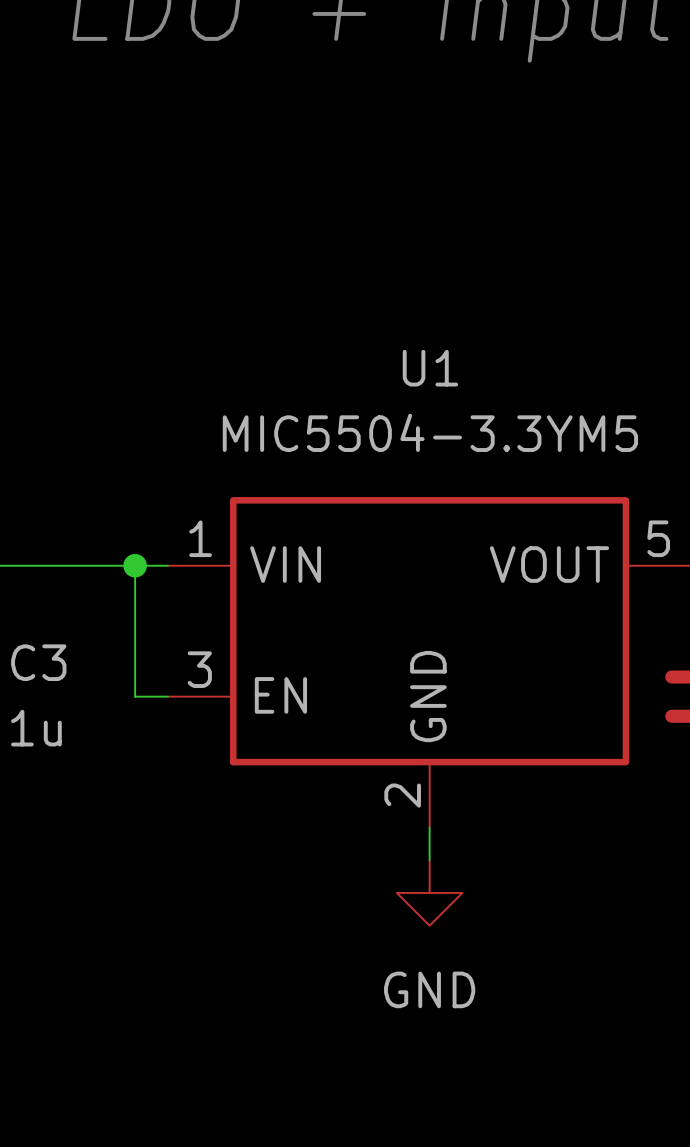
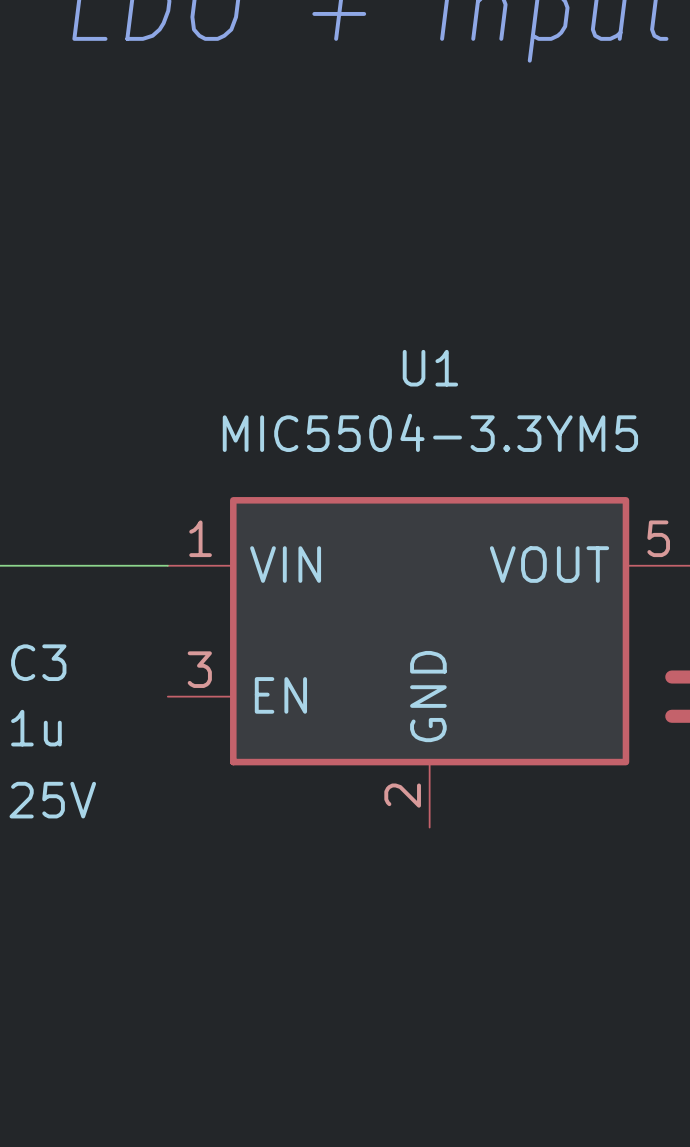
wire: (135, 565) (135, 696) (167, 696) -> none
junction: (135, 565) -> none
C3 text: none -> 25V (52, 800)
wire: (429, 827) (429, 860) -> none
power symbol: GND (429, 892) -> none

